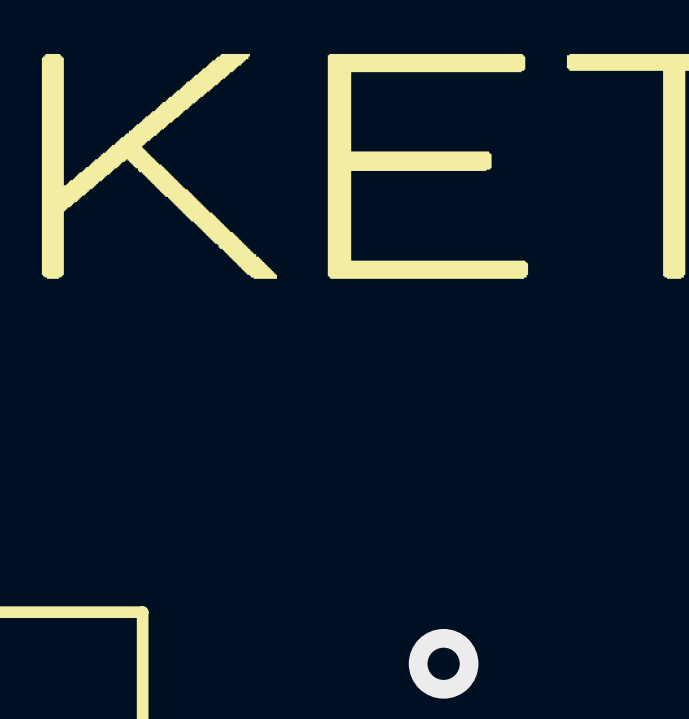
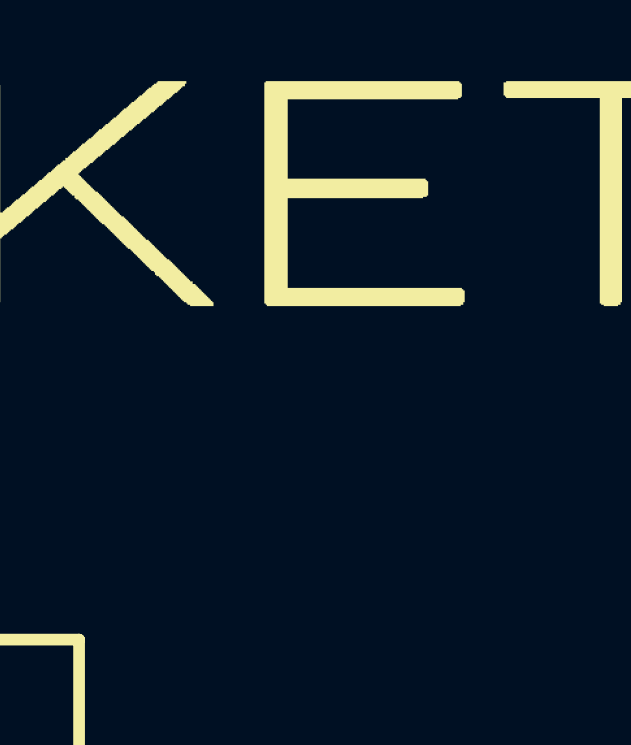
via: (443, 663) -> none

